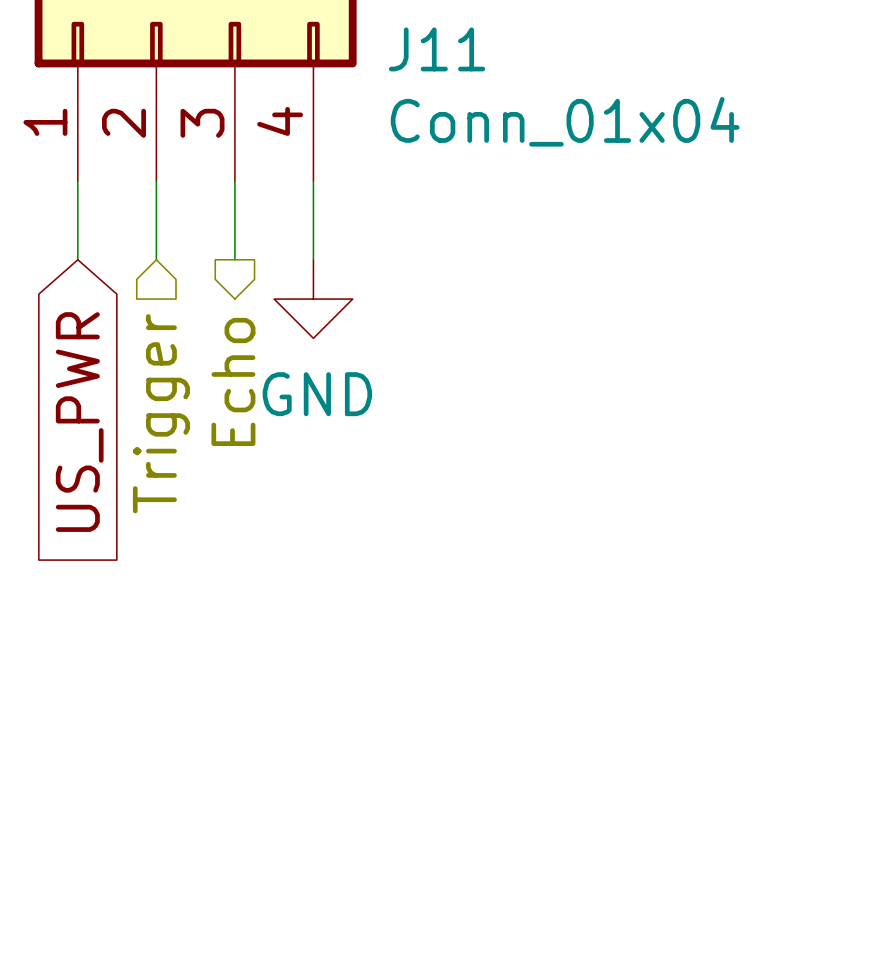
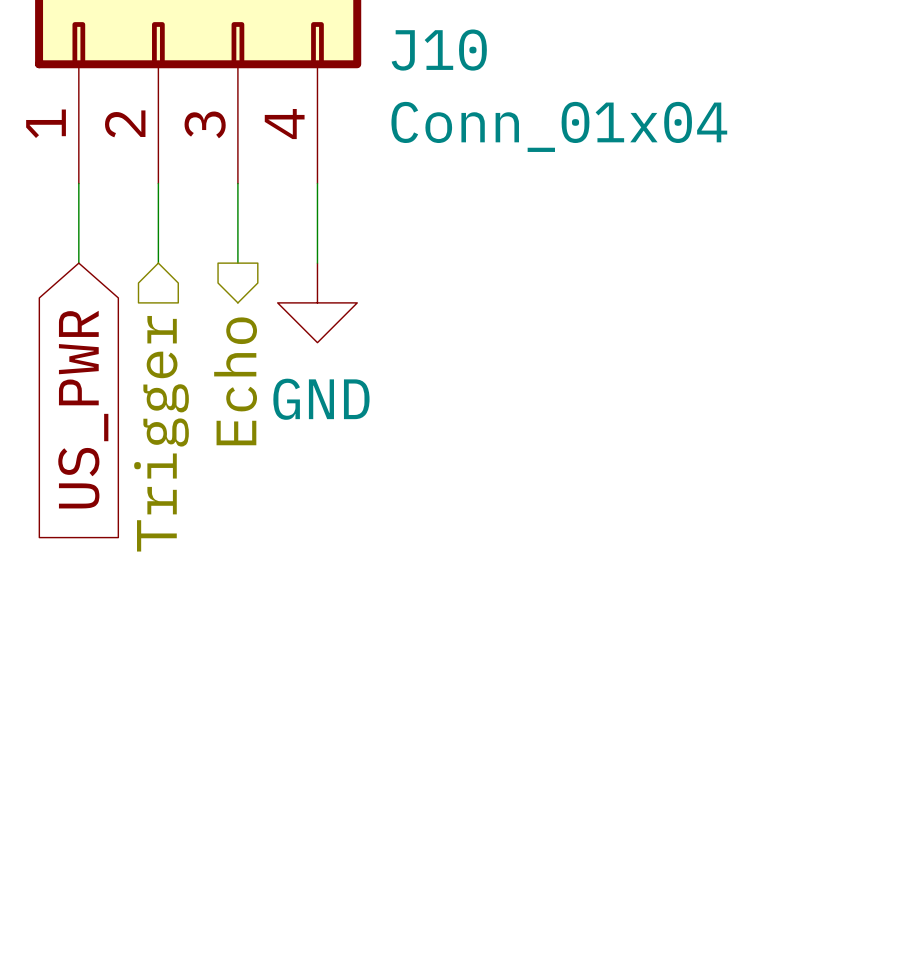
J11 name: J11 (437, 49) -> J10 (439, 50)

